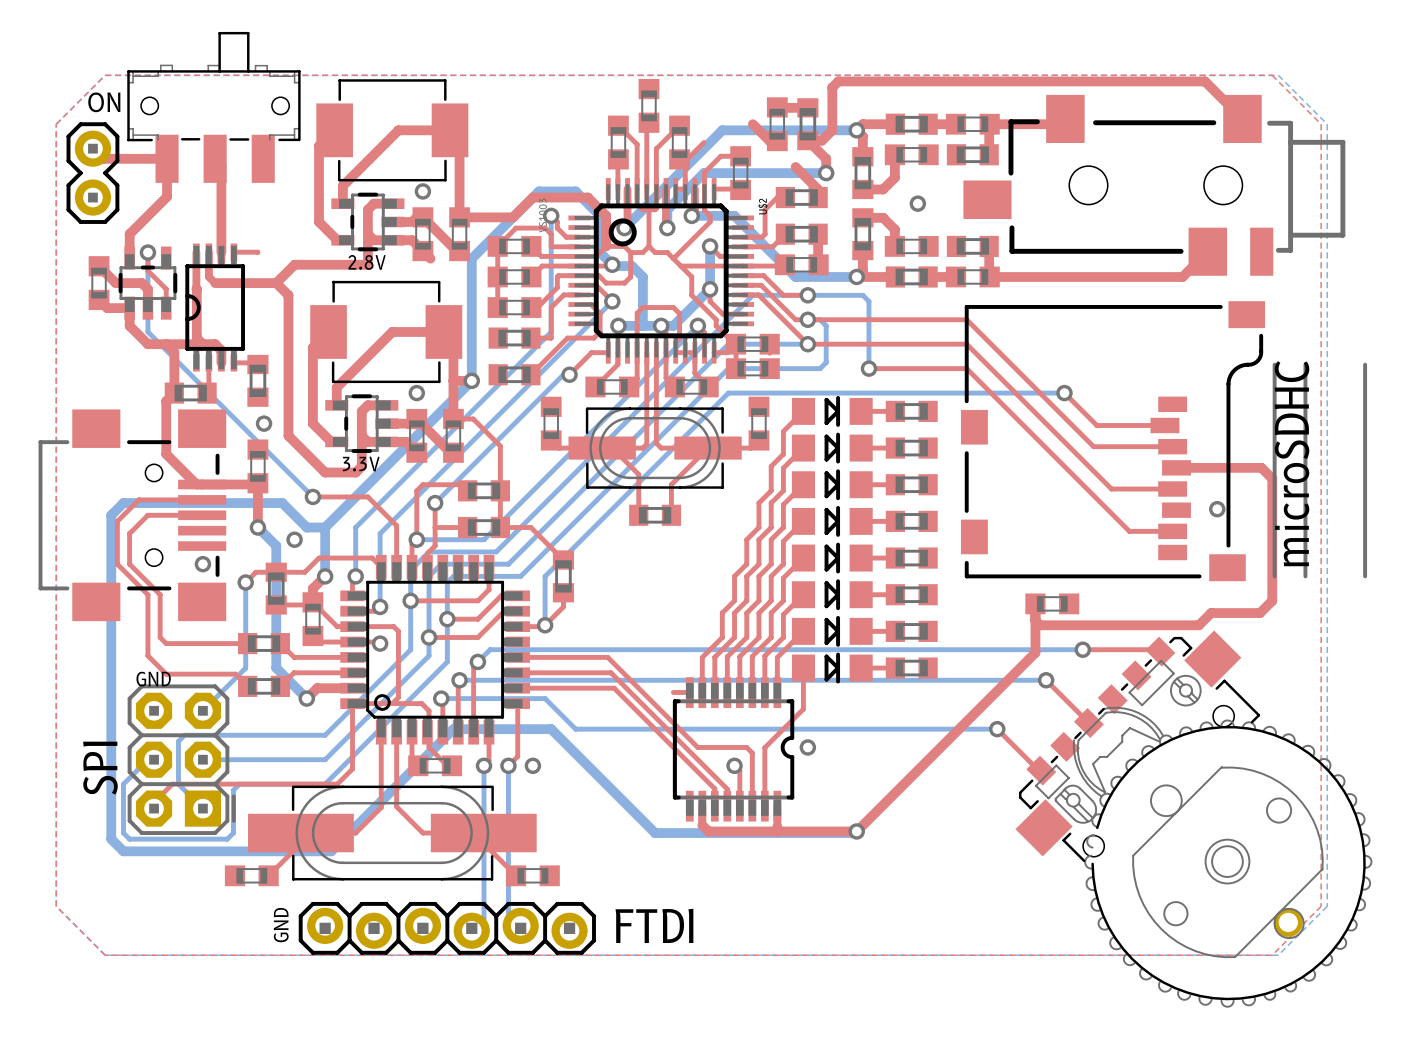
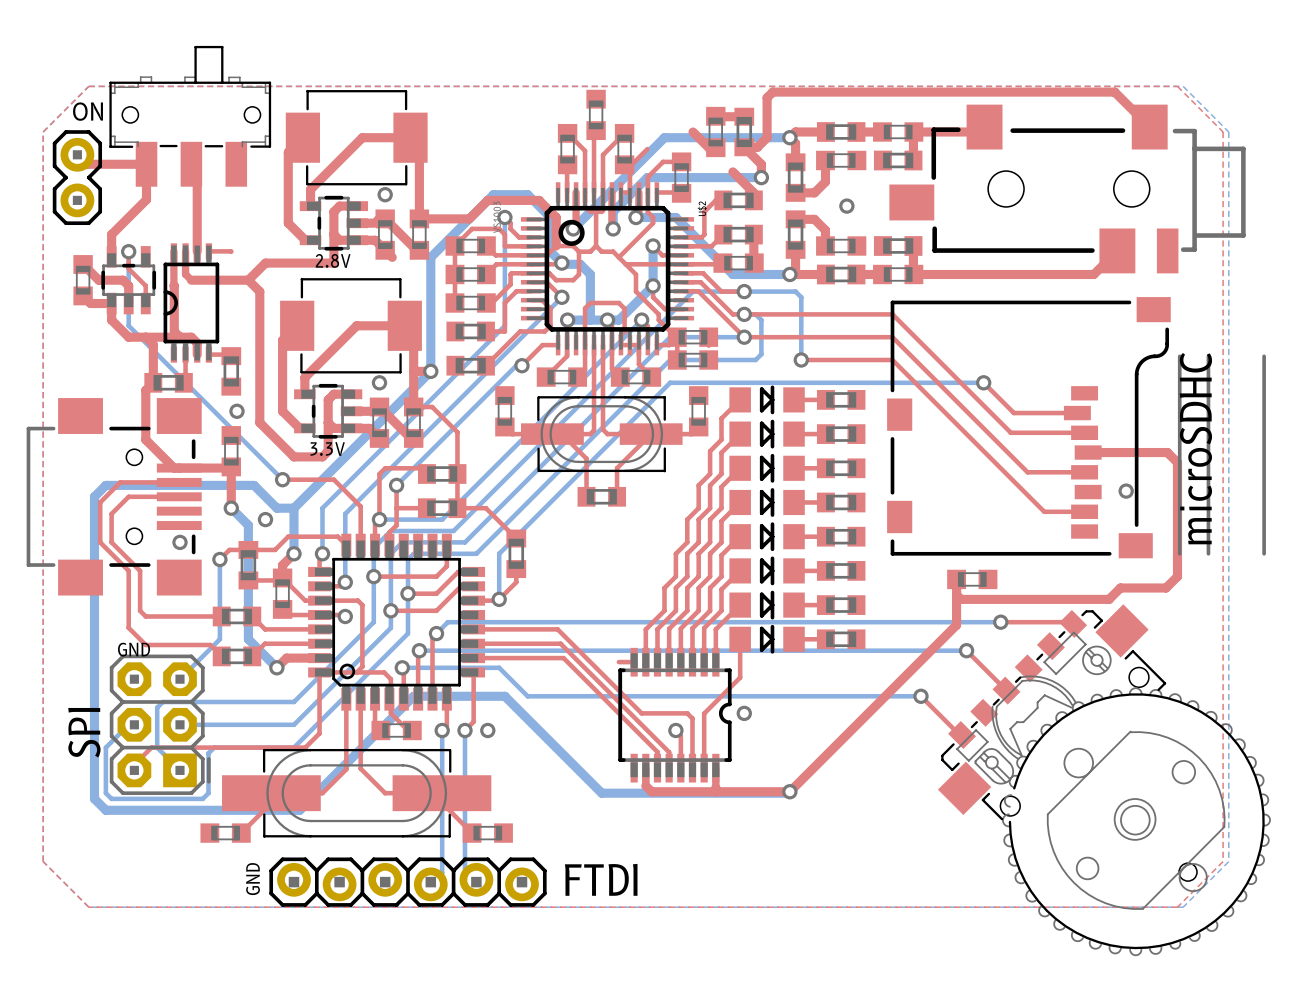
part footprint: [1015, 630, 1373, 1008] -> [938, 604, 1271, 957]

